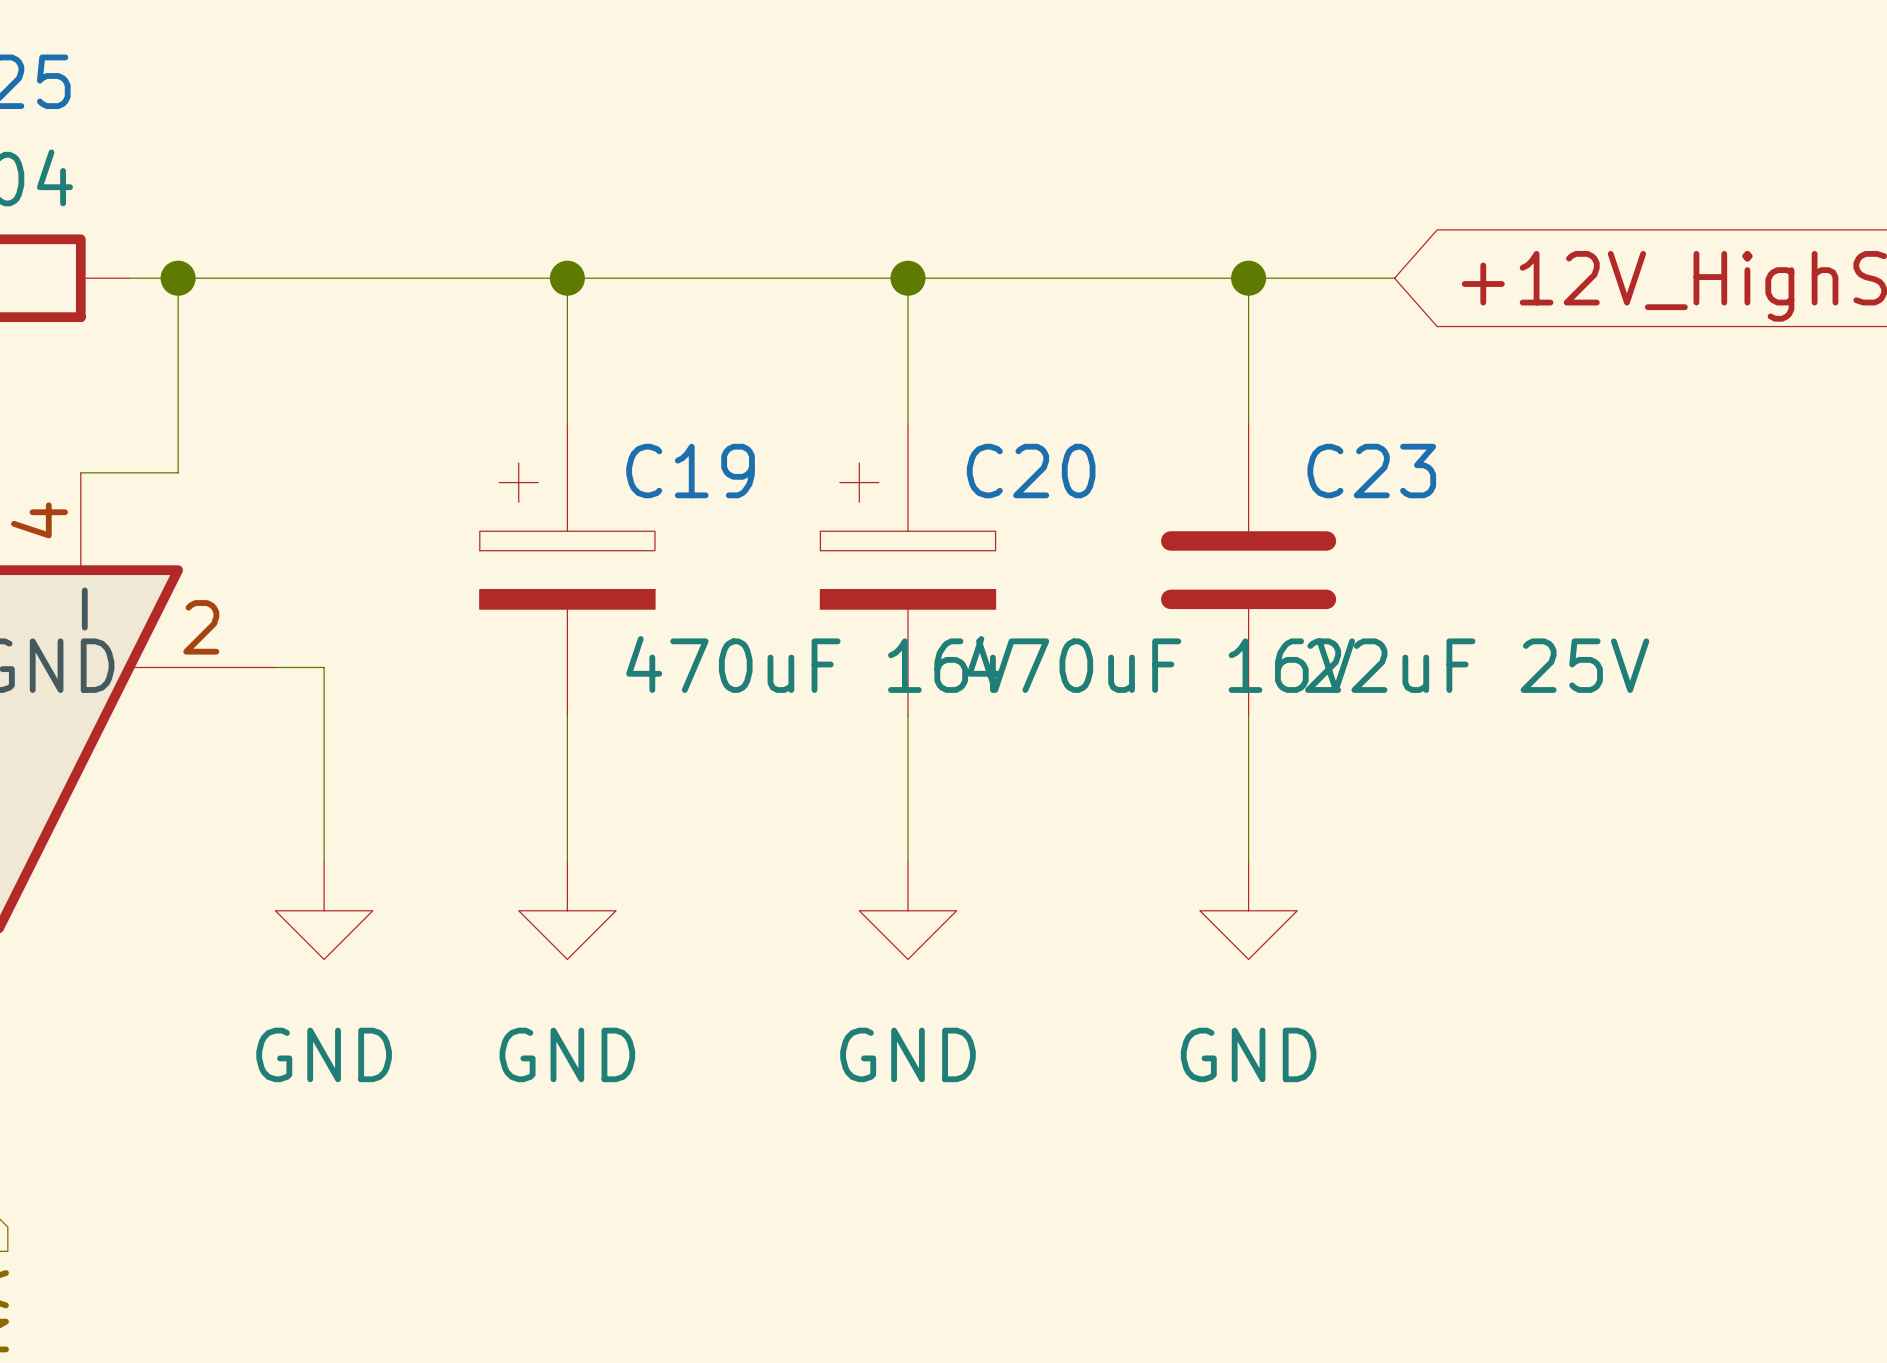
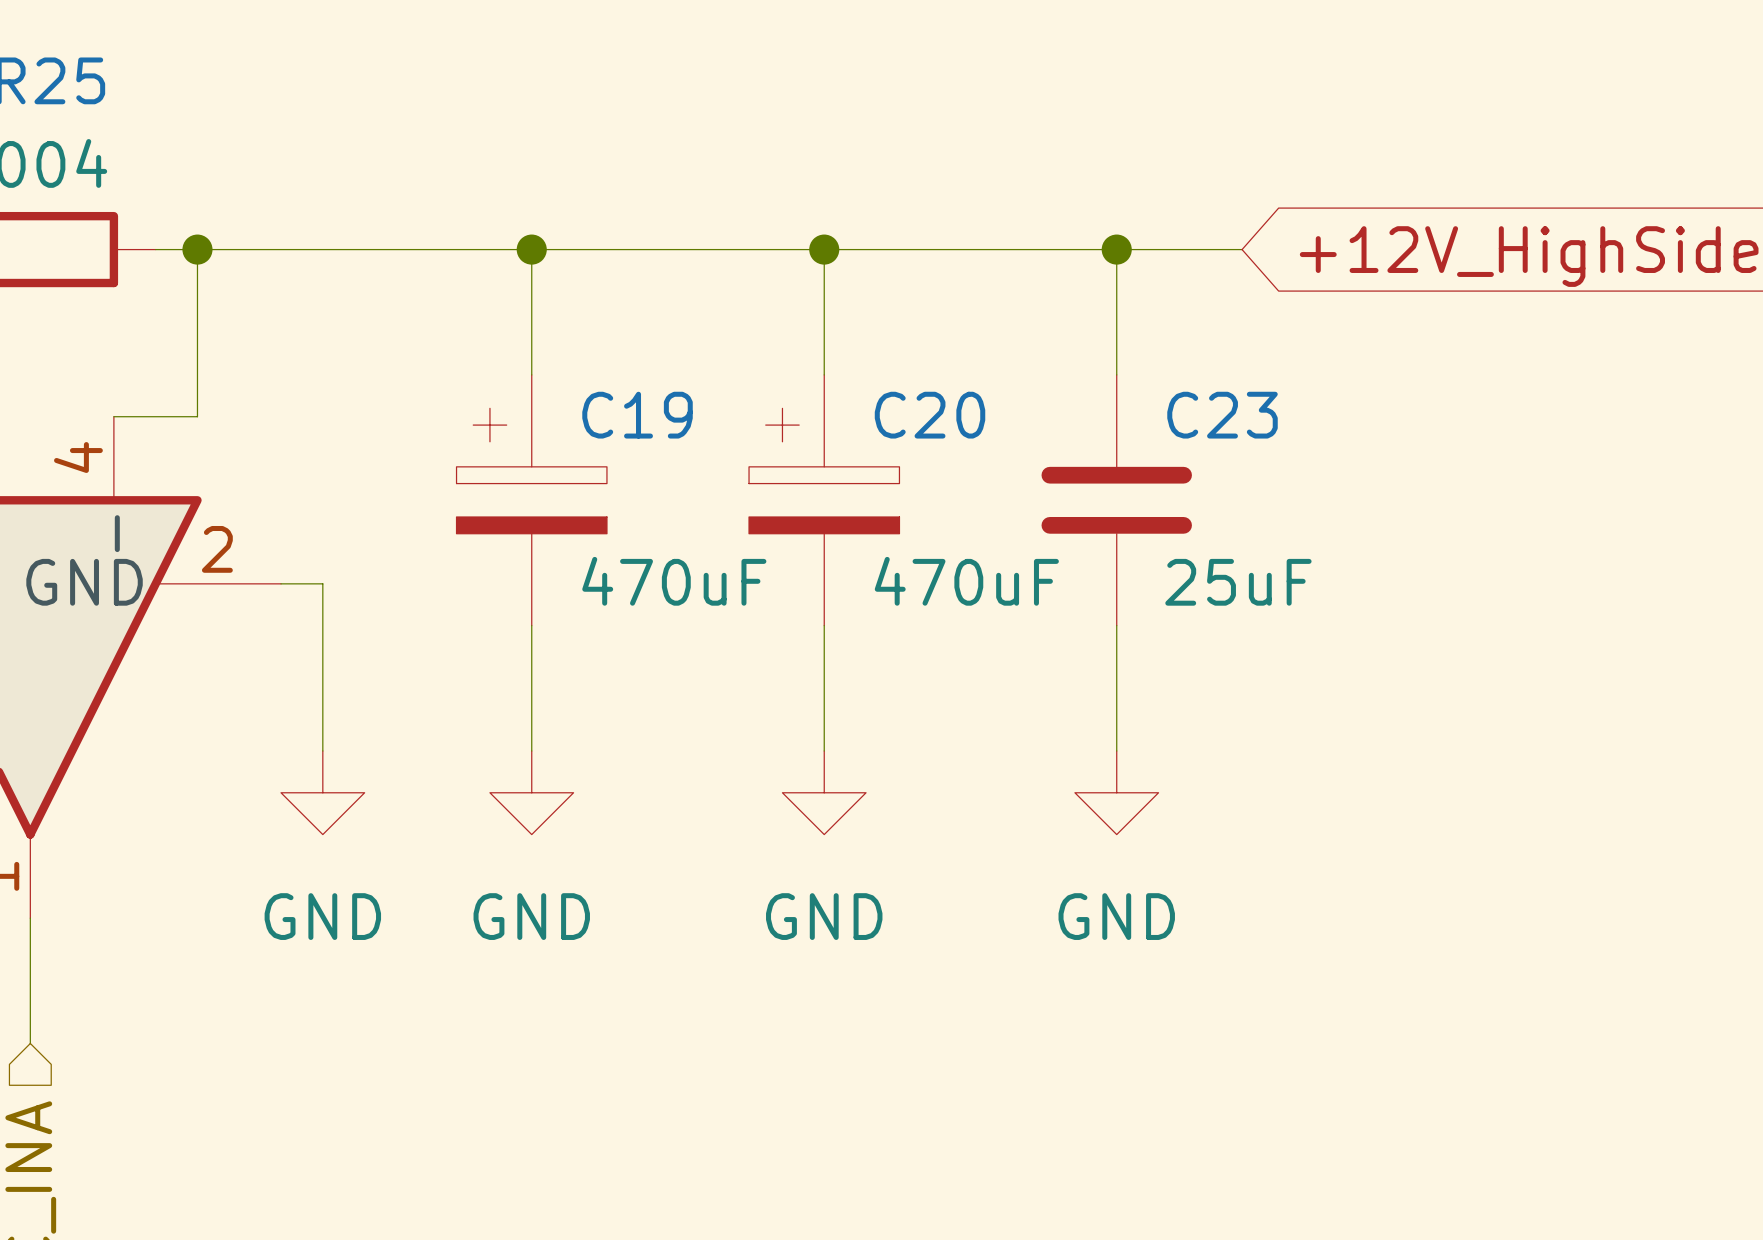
C19 value: 470uF 16V (820, 664) -> 470uF (674, 581)
C20 value: 470uF 16V (1160, 664) -> 470uF (966, 581)
C23 value: 22uF 25V (1477, 665) -> 25uF (1238, 582)

